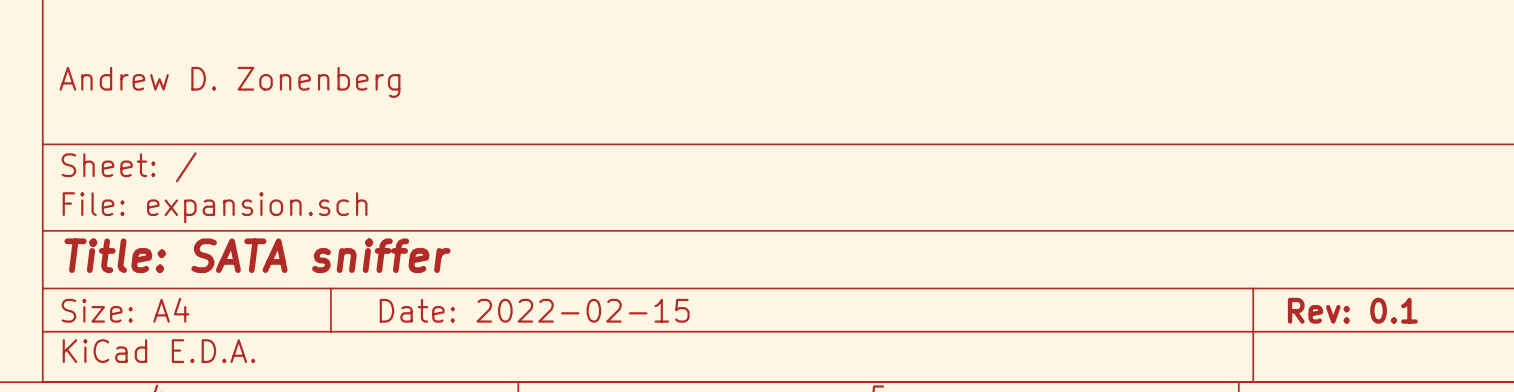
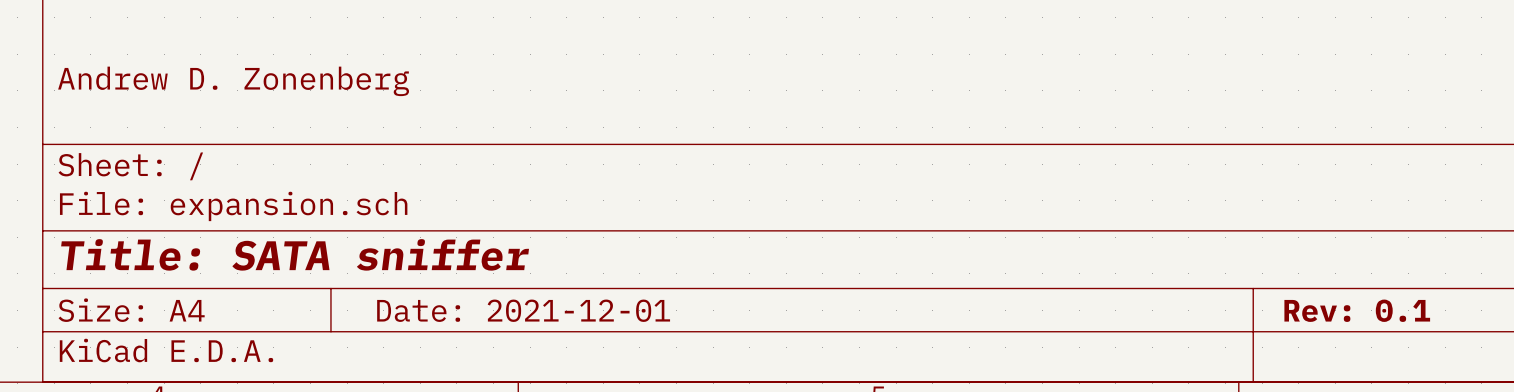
title block: Date: 2022-02-15 (534, 310) -> Date: 2021-12-01 (523, 310)

